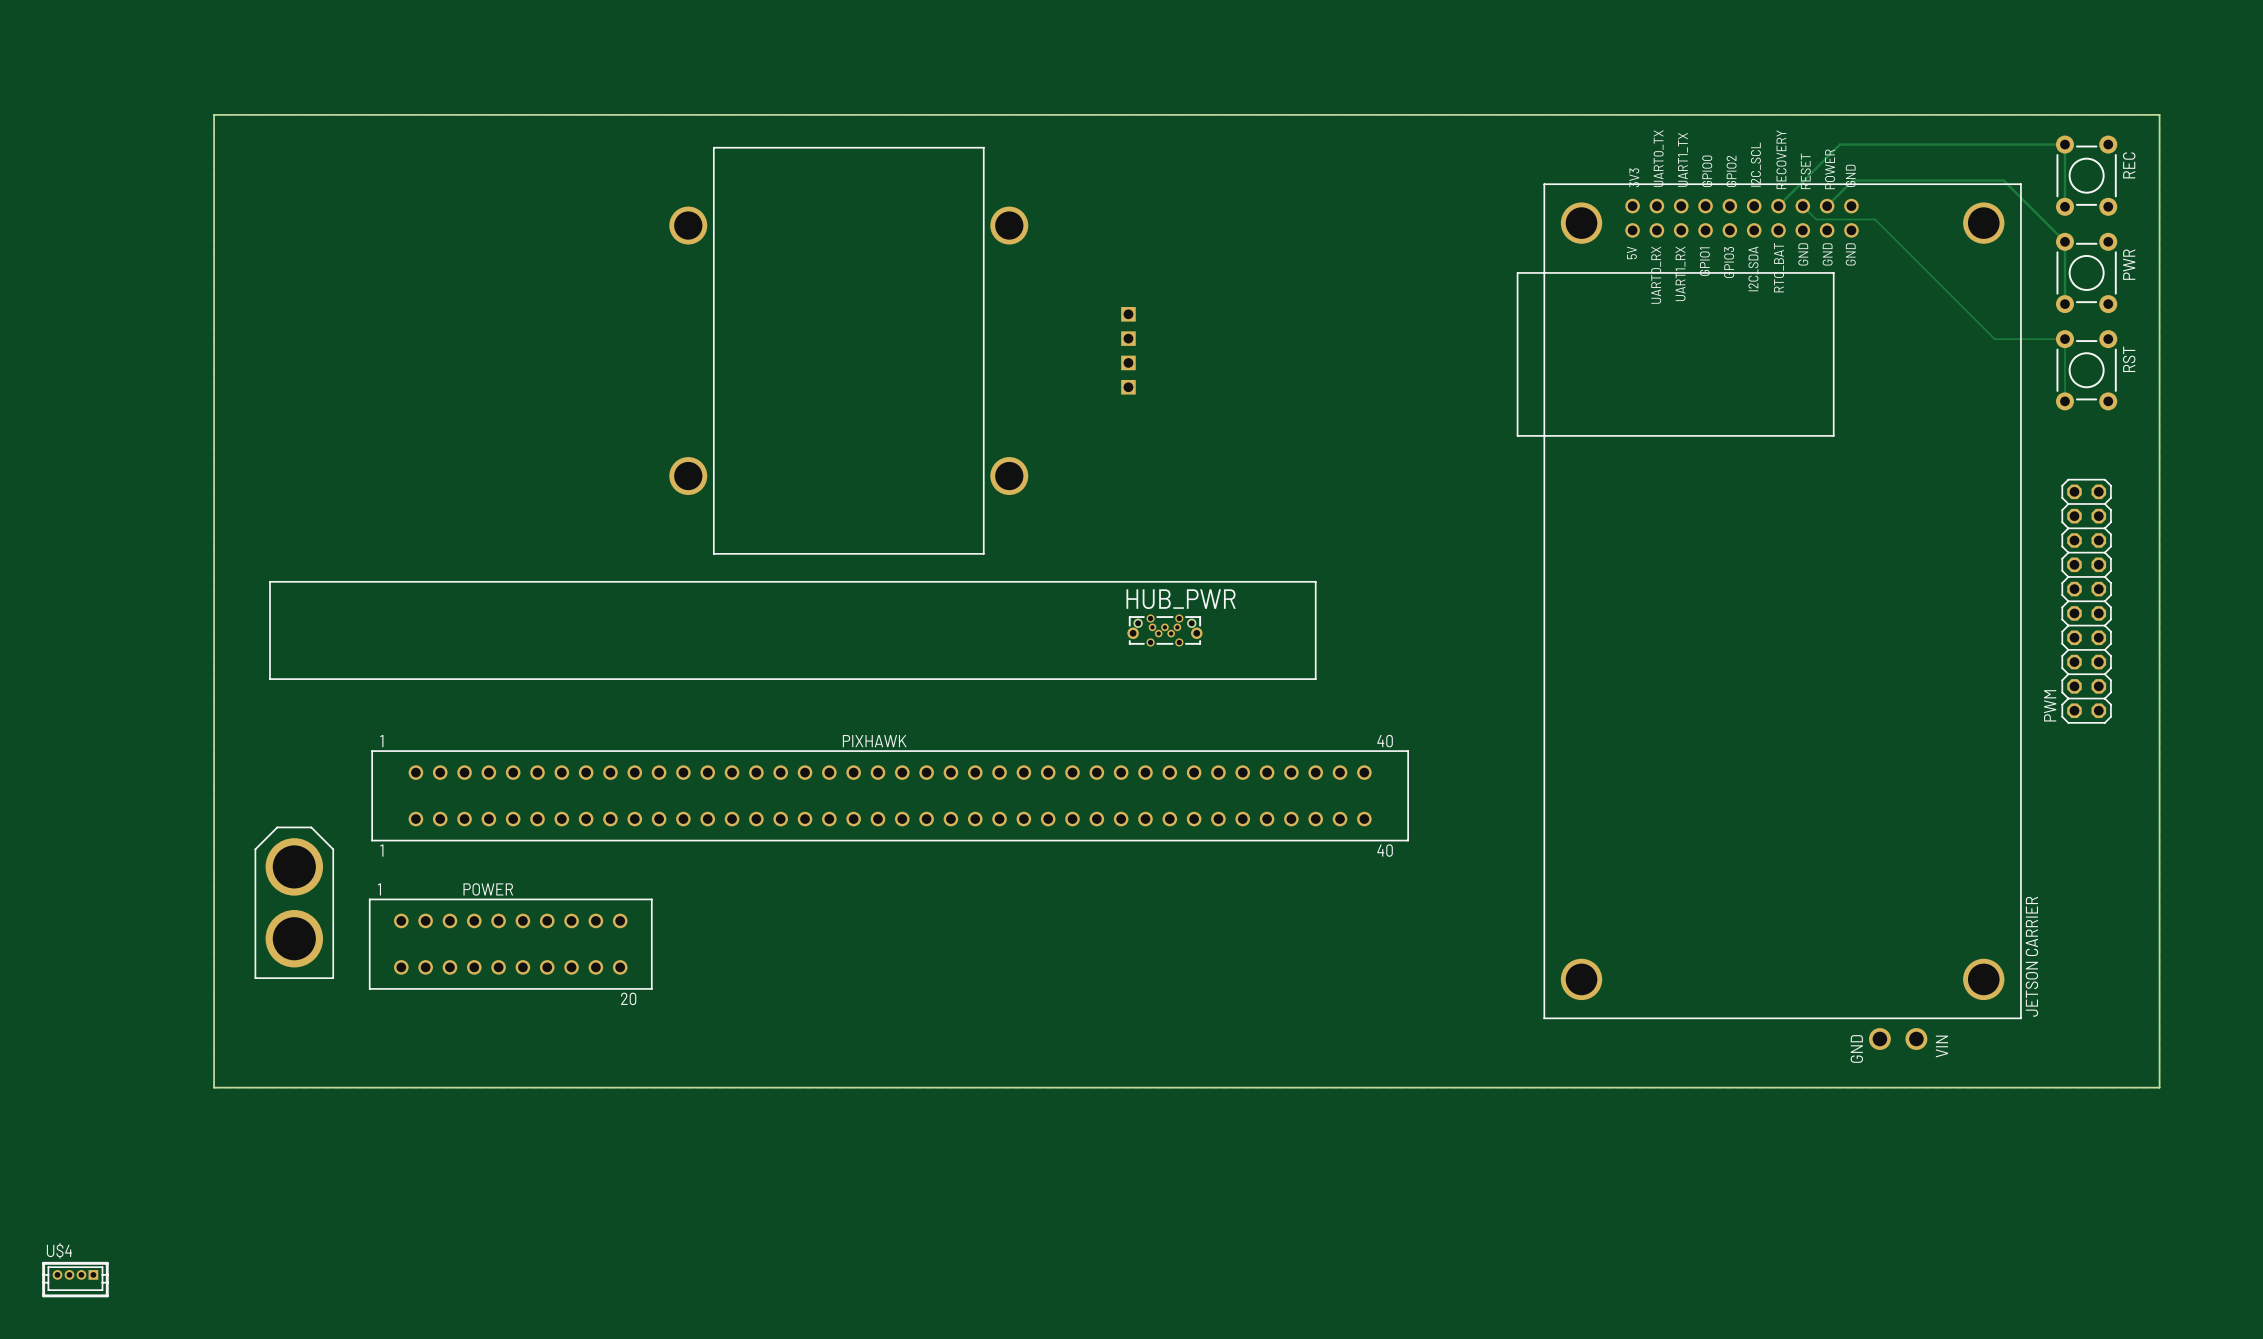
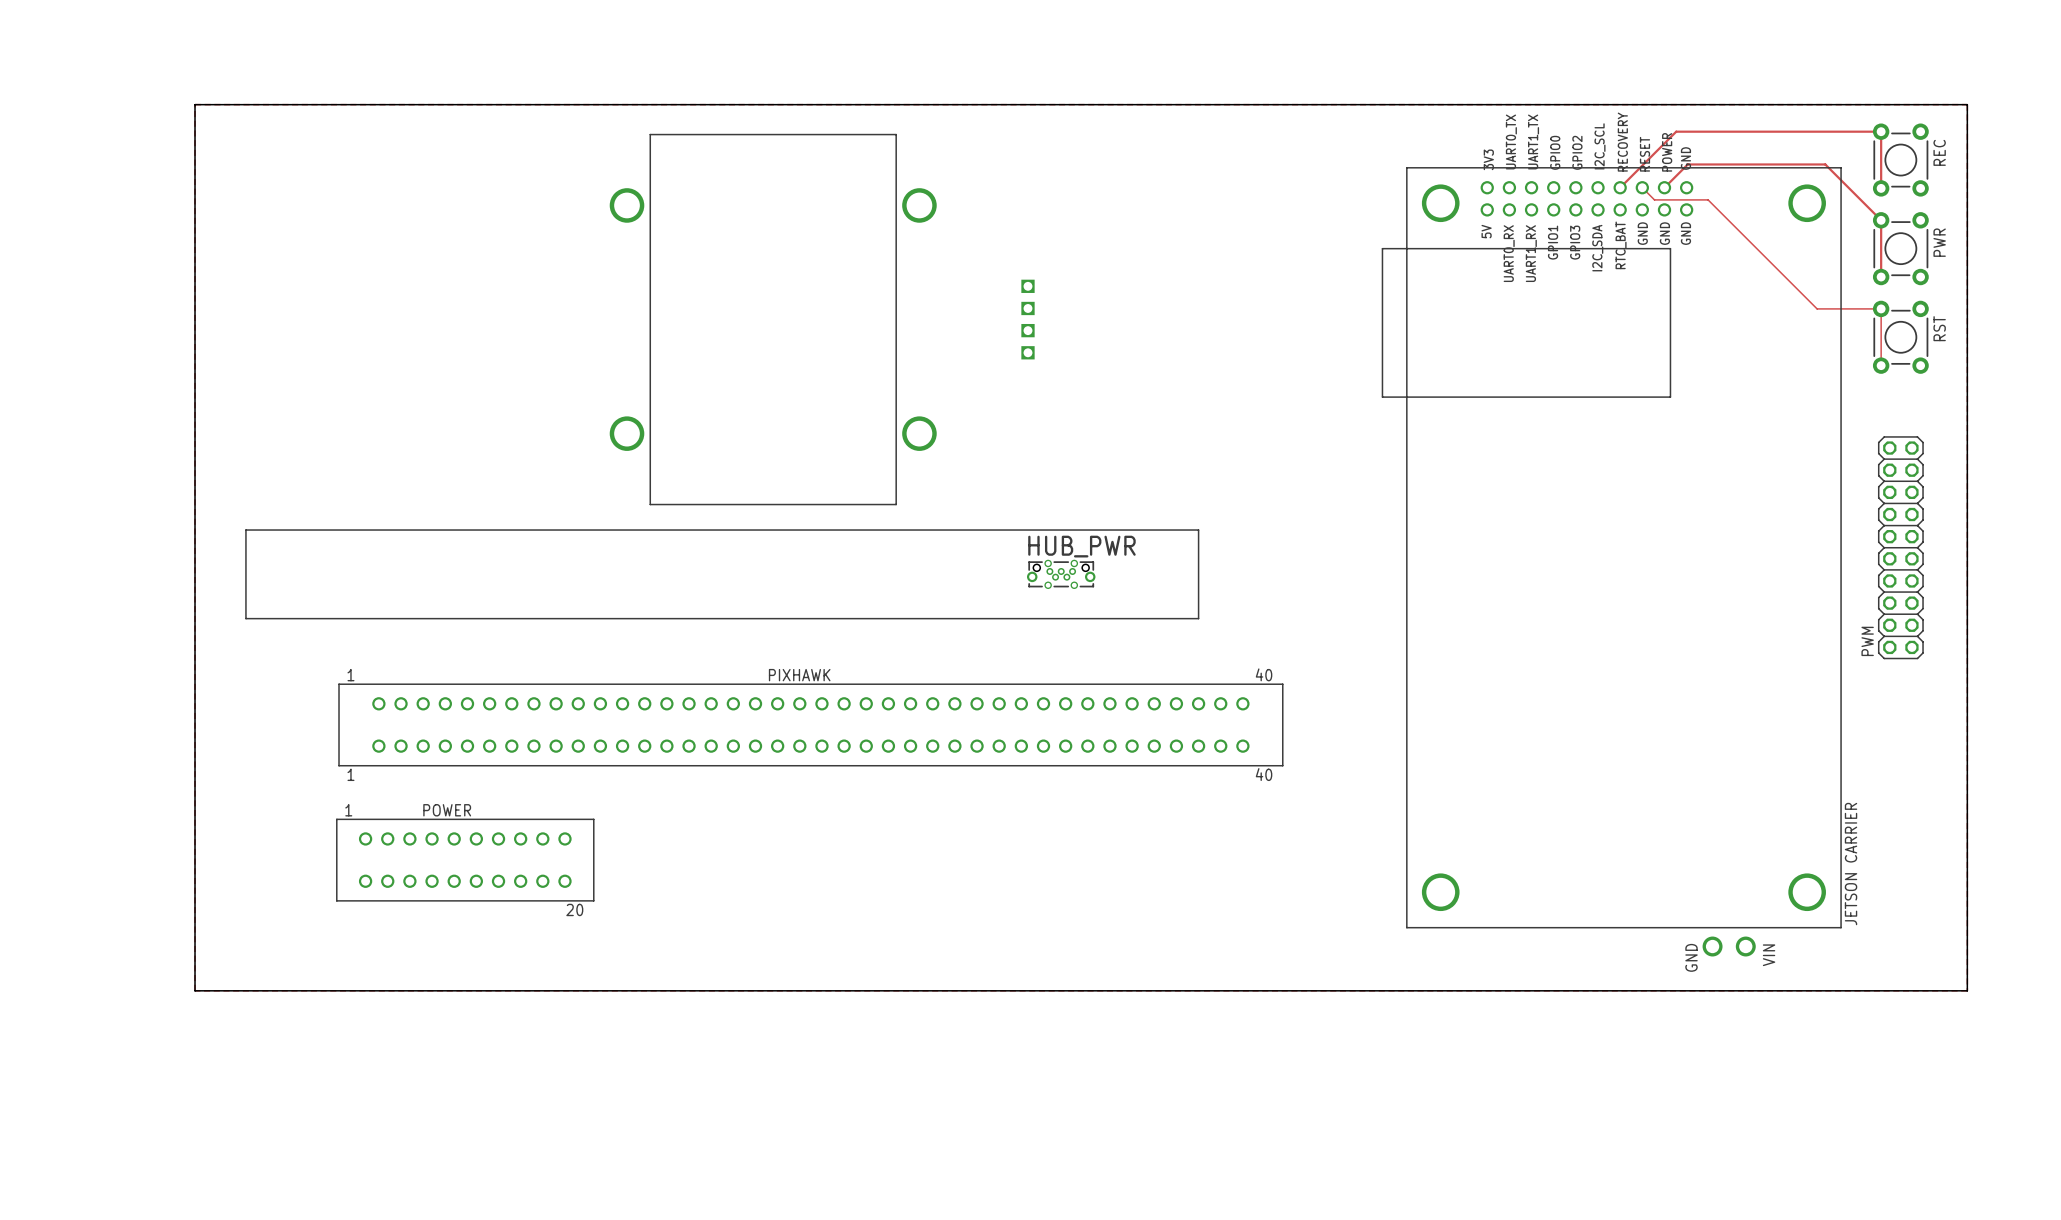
part: (294, 902) -> none
U$4: (75, 1279) -> none

